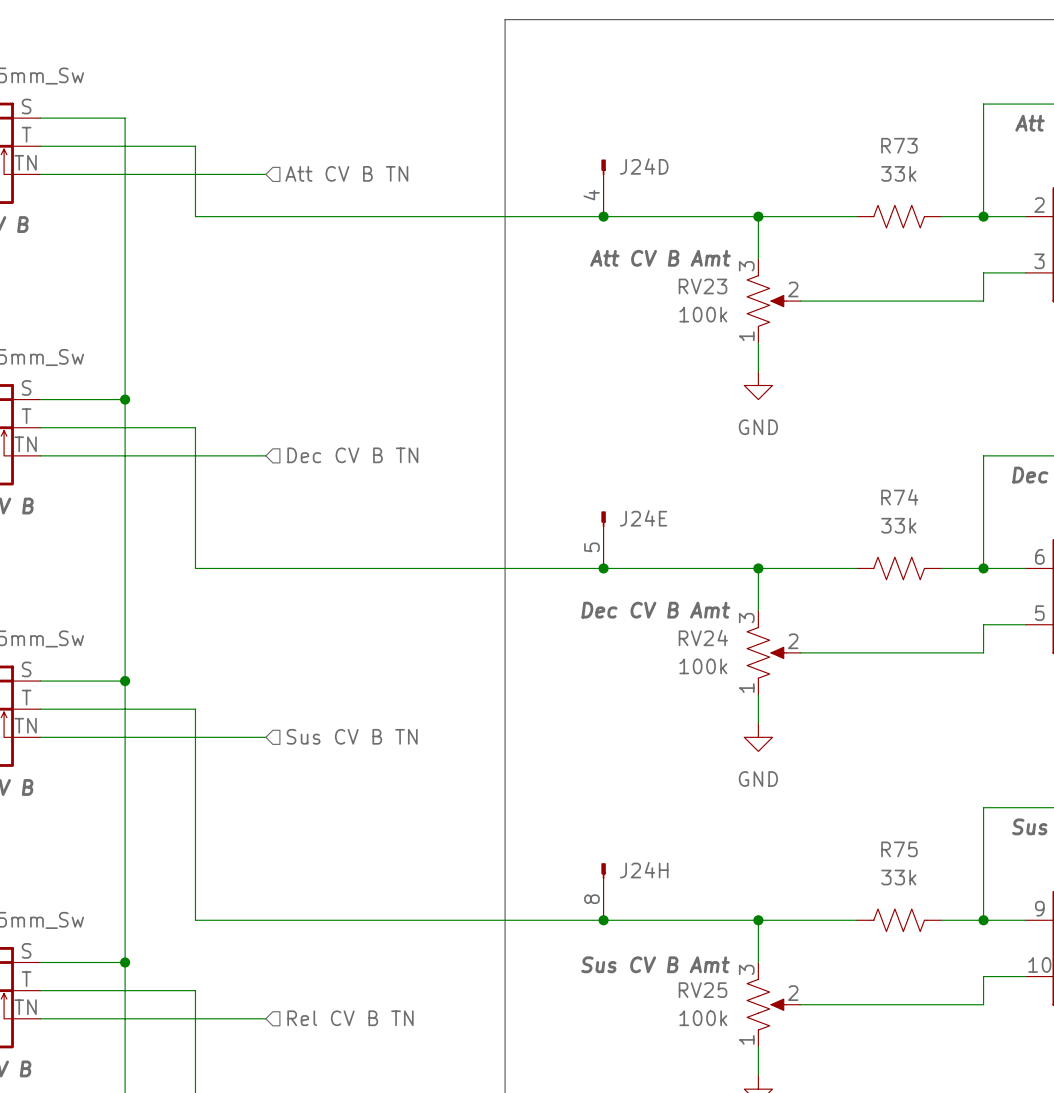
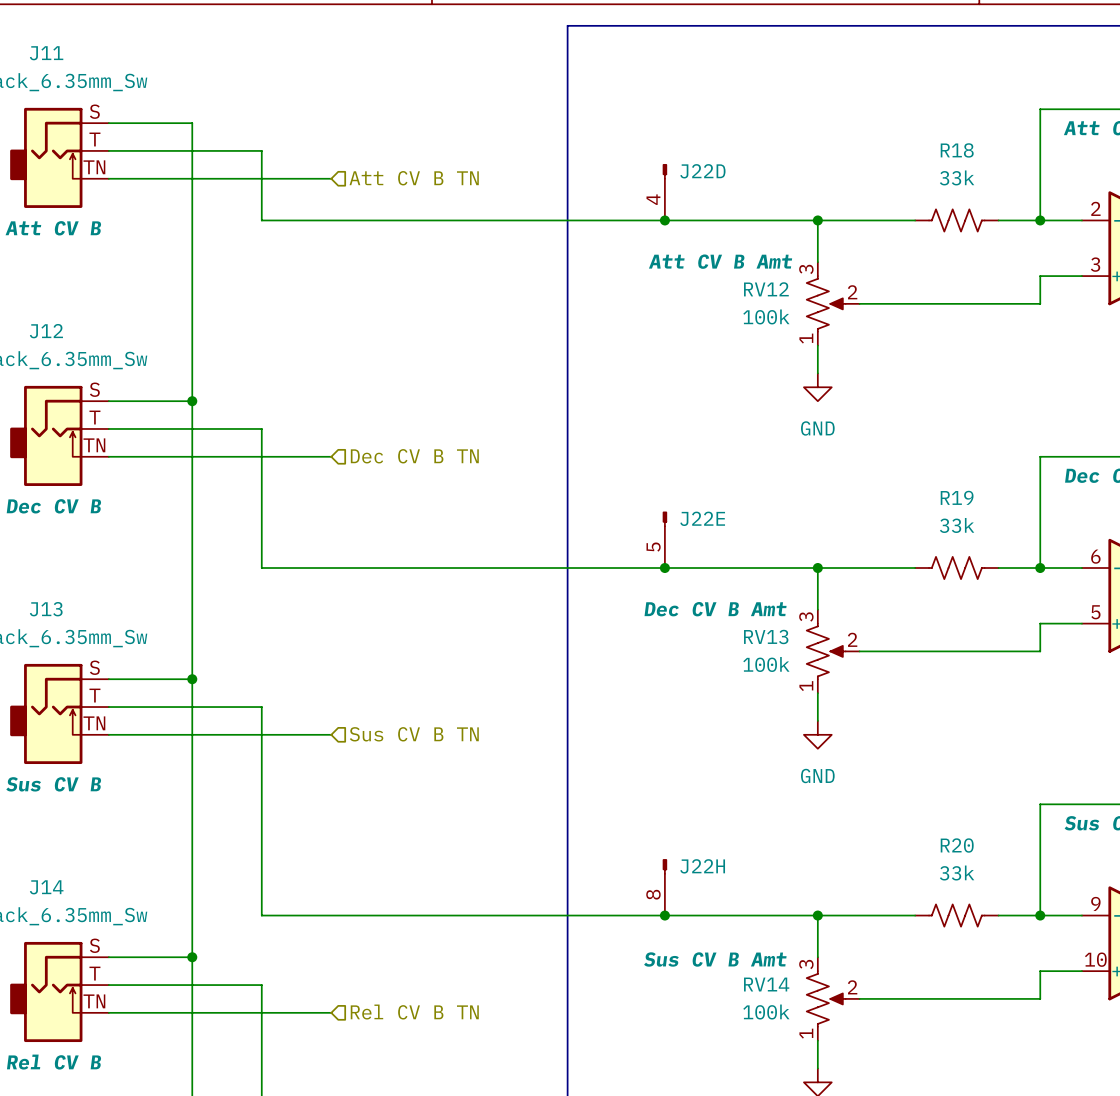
R73 name: R73 (899, 145) -> R18 (957, 150)
J24D name: J24D (644, 166) -> J22D (702, 171)
RV23 name: RV23 (702, 286) -> RV12 (766, 289)
R74 name: R74 (899, 497) -> R19 (957, 497)
J24E name: J24E (643, 518) -> J22E (702, 518)
RV24 name: RV24 (703, 637) -> RV13 (766, 636)
R75 name: R75 (899, 849) -> R20 (957, 845)
J24H name: J24H (644, 870) -> J22H (702, 866)
RV25 name: RV25 (702, 990) -> RV14 (766, 984)

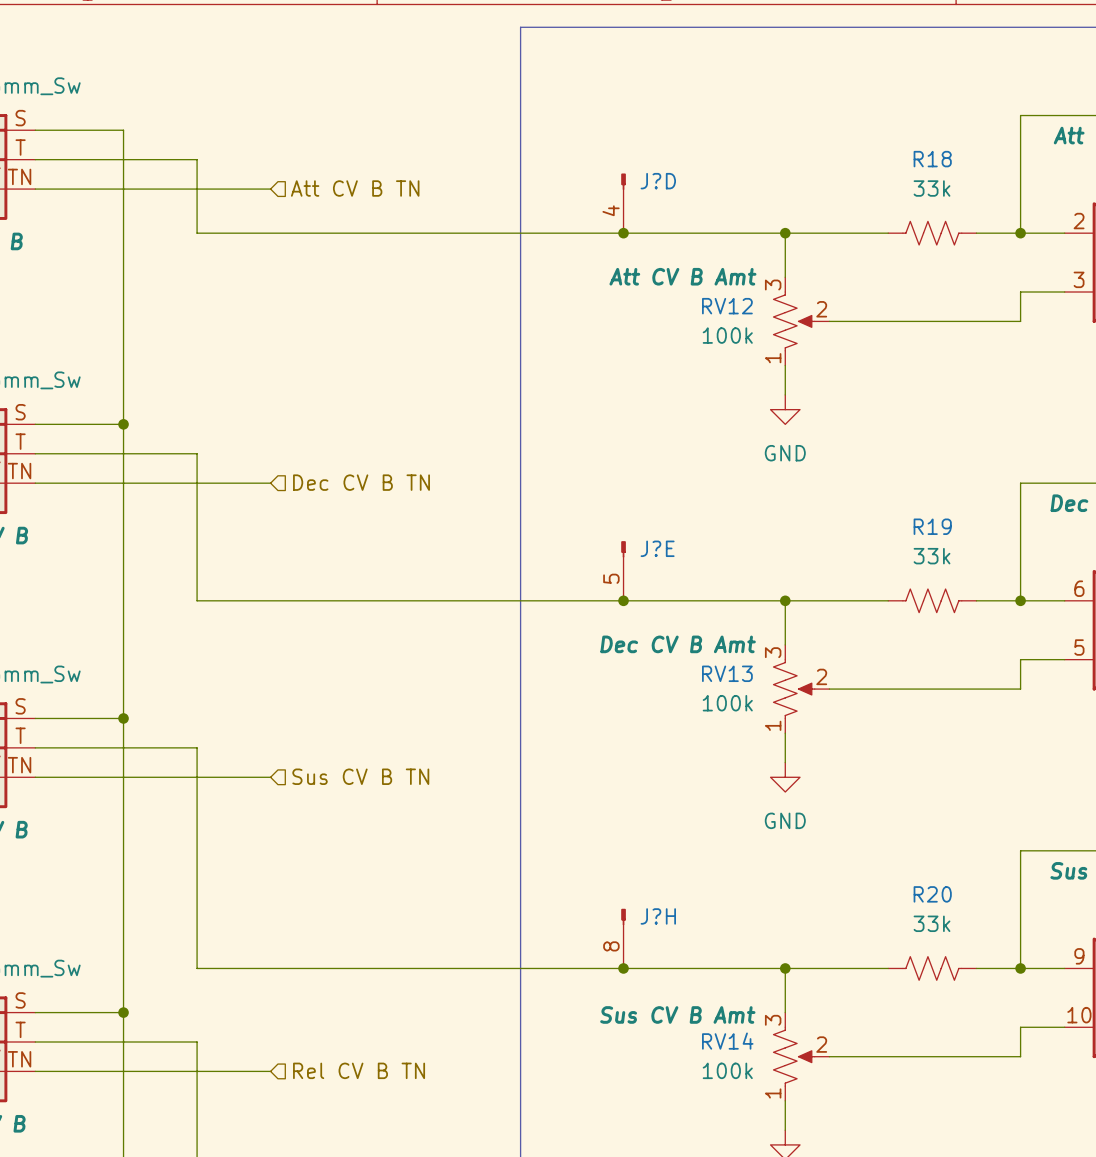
J22D name: J22D (702, 171) -> J?D (658, 181)
J22E name: J22E (702, 518) -> J?E (657, 548)
J22H name: J22H (702, 866) -> J?H (658, 916)

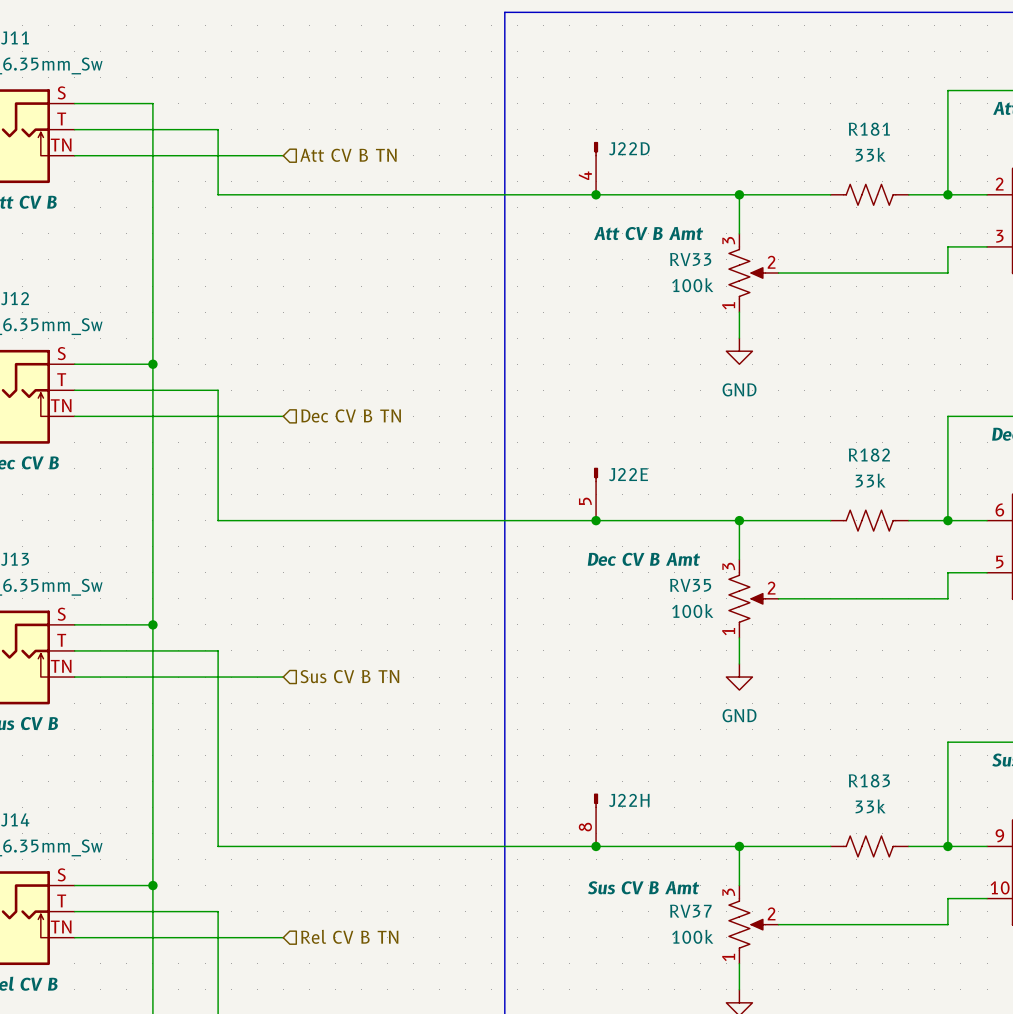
R18 name: R18 (932, 159) -> R181 (869, 129)
J?D name: J?D (658, 181) -> J22D (629, 148)
RV12 name: RV12 (727, 306) -> RV33 (690, 259)
R19 name: R19 (932, 526) -> R182 (869, 455)
J?E name: J?E (657, 548) -> J22E (628, 474)
RV13 name: RV13 (727, 673) -> RV35 (690, 585)
R20 name: R20 (932, 894) -> R183 (869, 780)
J?H name: J?H (658, 916) -> J22H (629, 800)
RV14 name: RV14 (727, 1041) -> RV37 (690, 911)

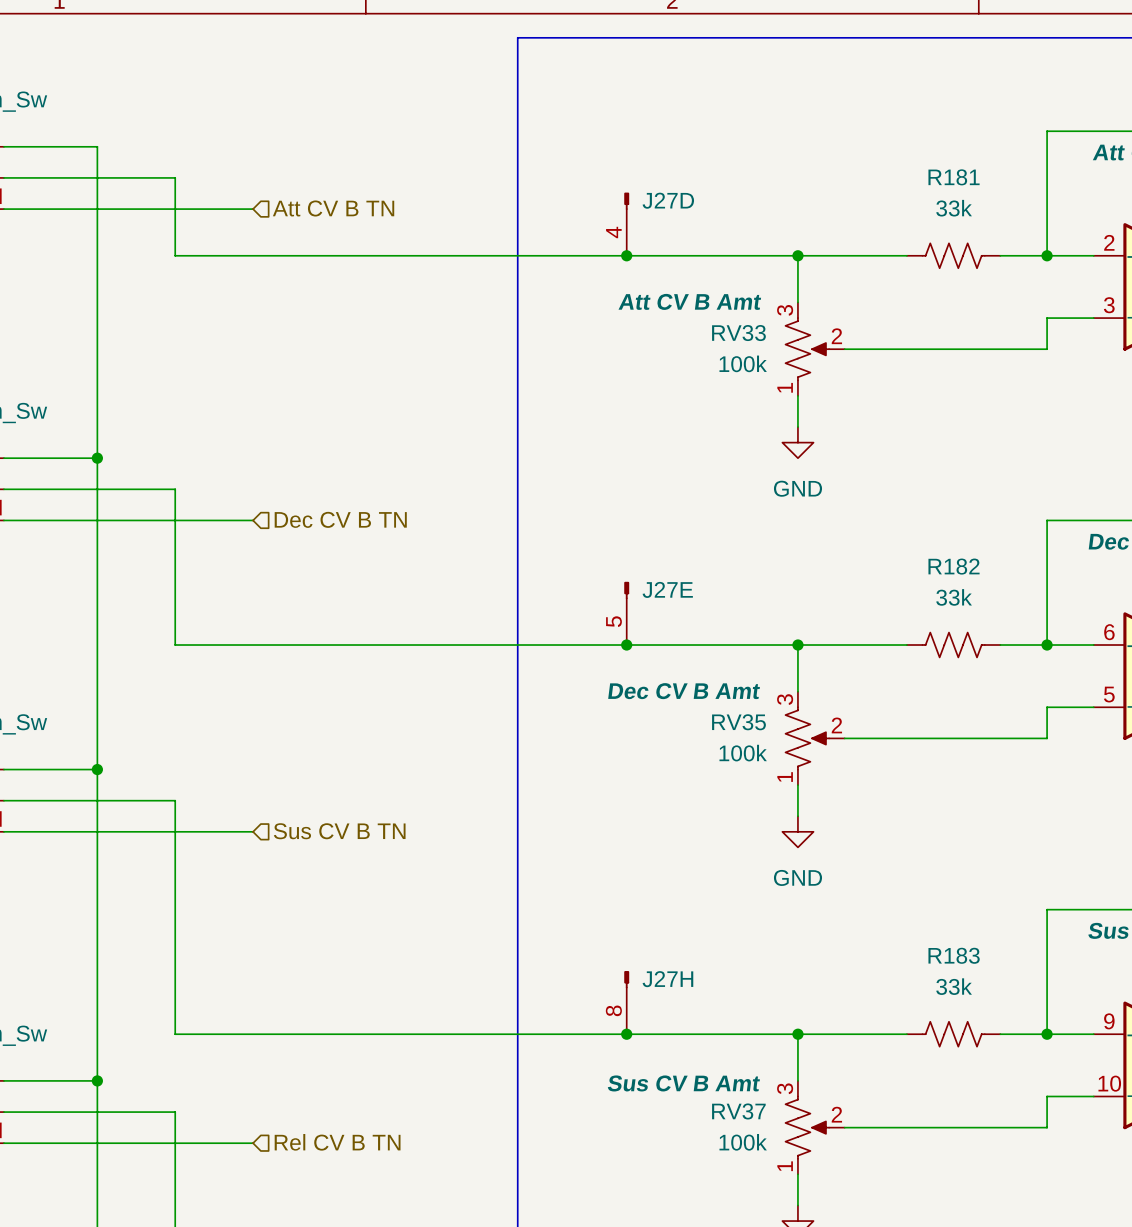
J22D name: J22D (629, 148) -> J27D (668, 200)
J22E name: J22E (628, 474) -> J27E (667, 589)
J22H name: J22H (629, 800) -> J27H (667, 979)

